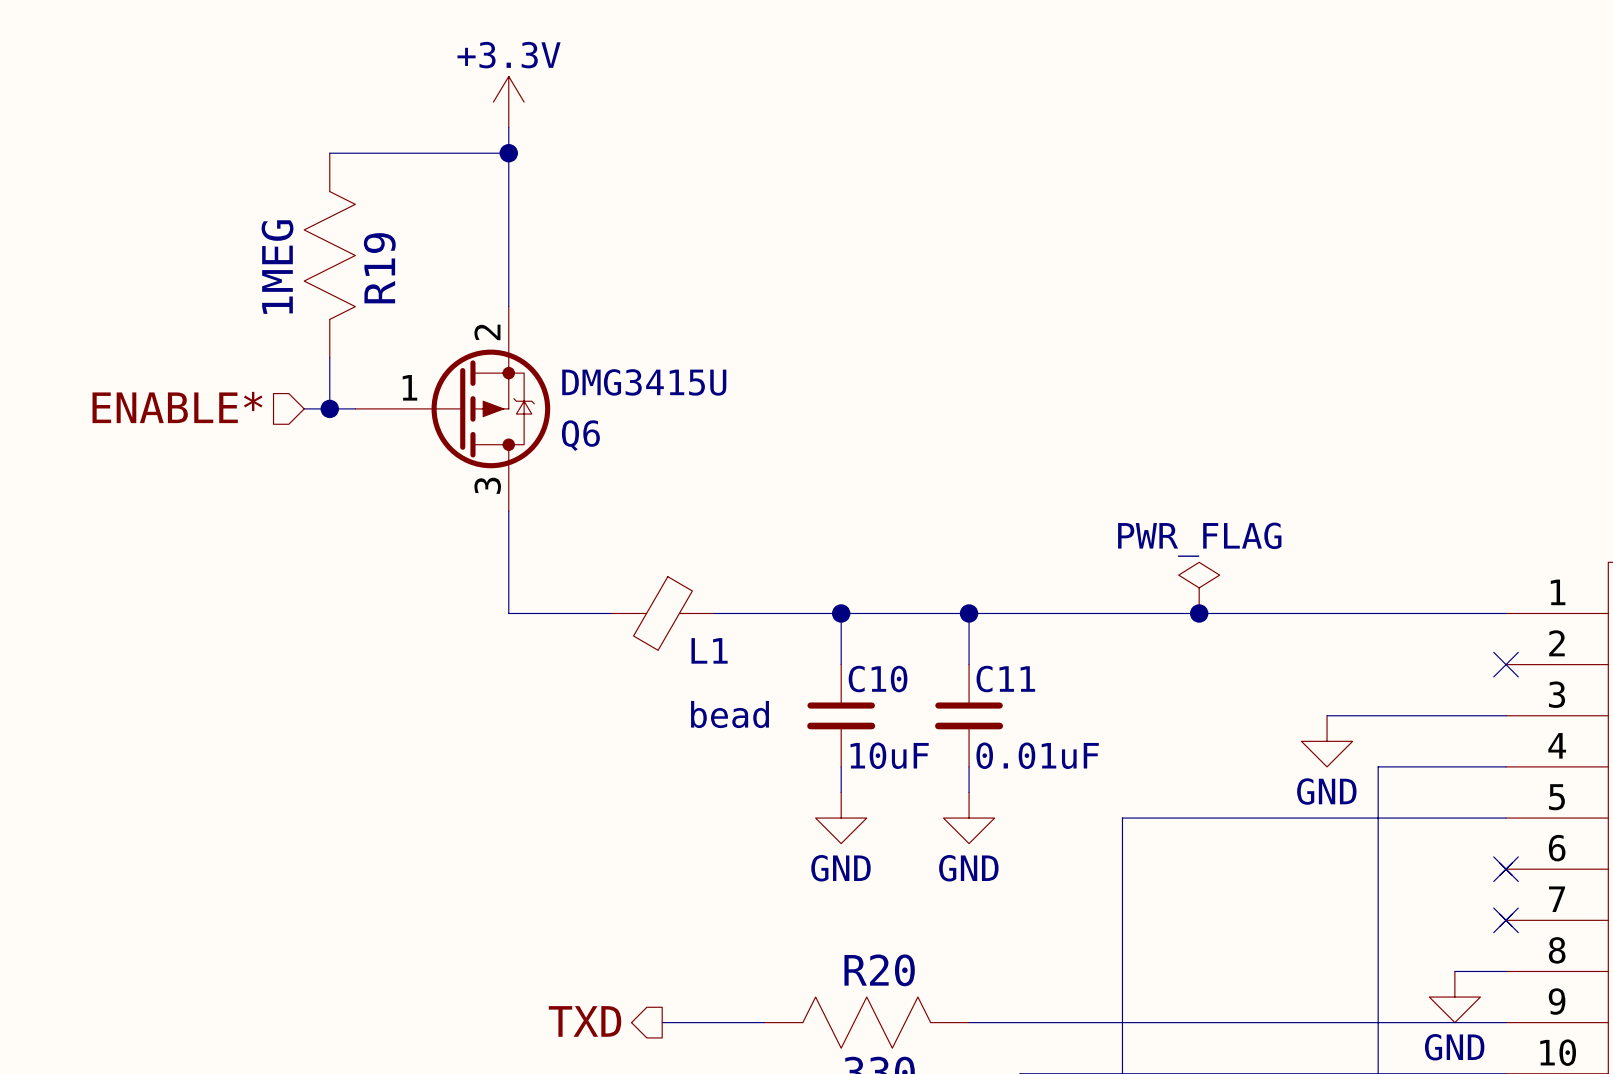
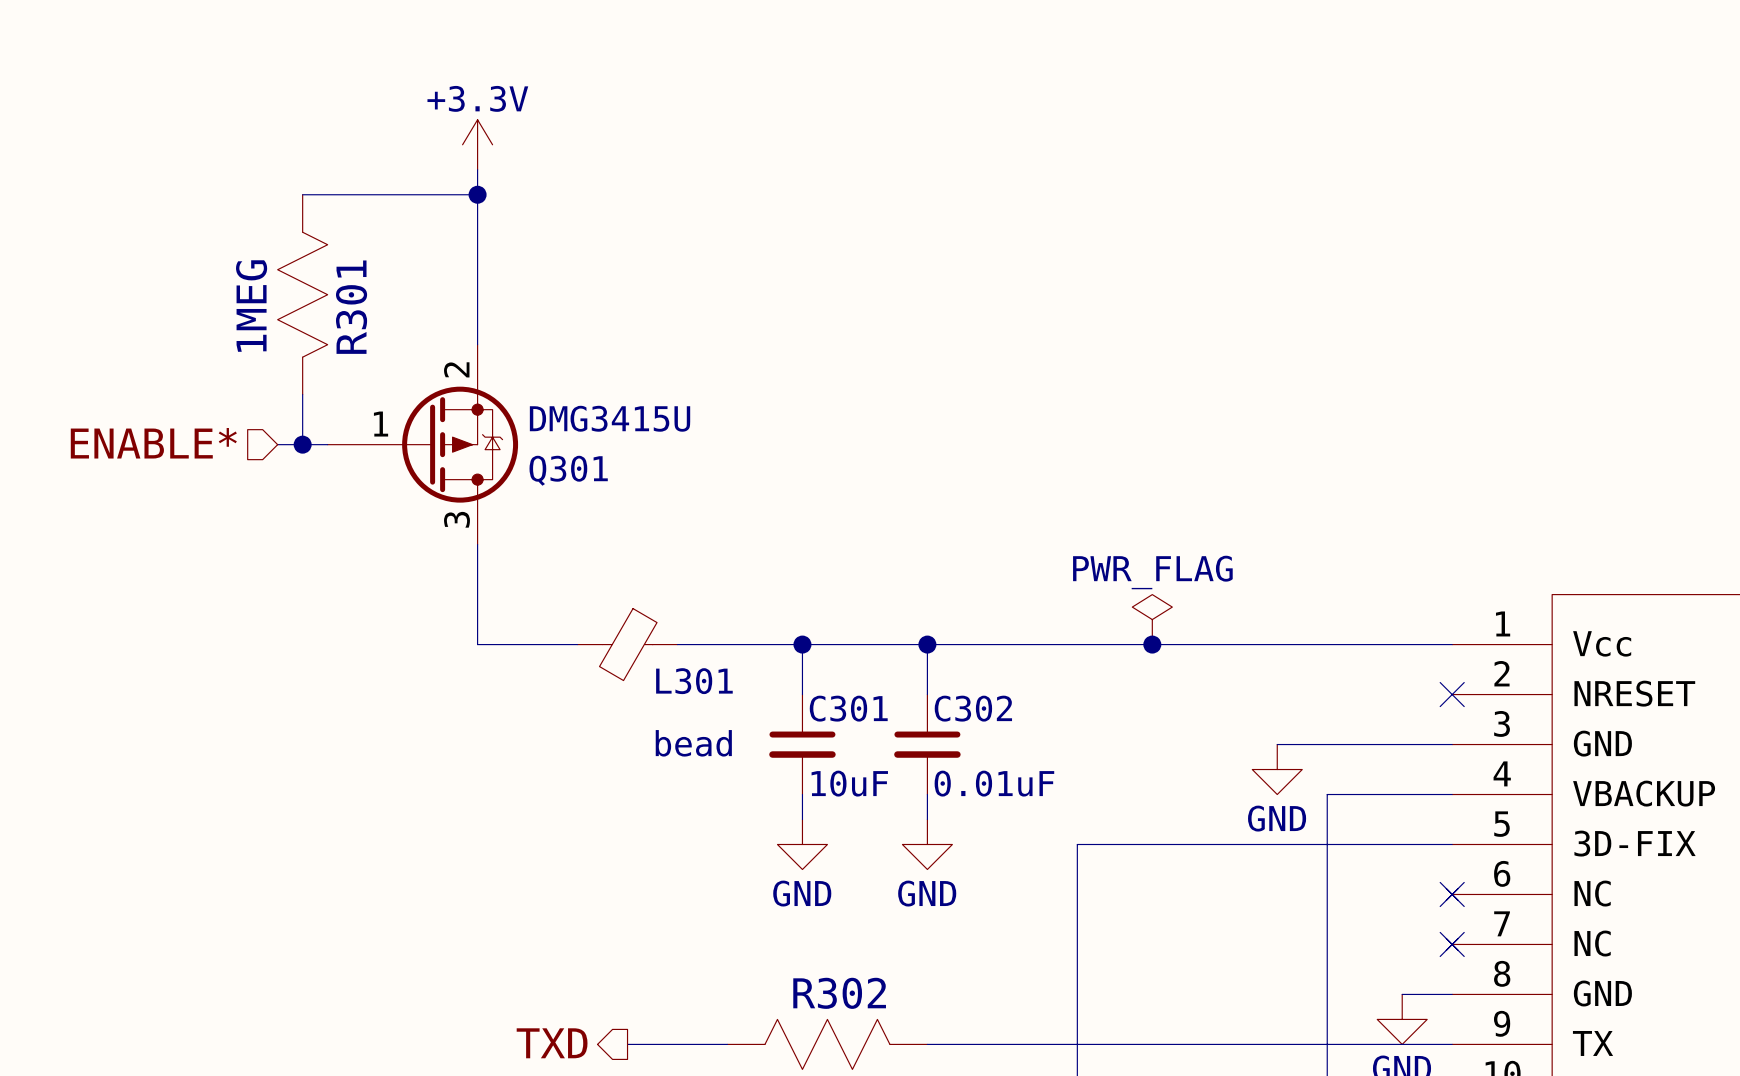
R19 name: R19 (379, 268) -> R301 (351, 307)
Q6 name: Q6 (580, 435) -> Q301 (568, 470)
L1 name: L1 (709, 650) -> L301 (694, 681)
C10 name: C10 (878, 679) -> C301 (848, 708)
C11 name: C11 (1005, 679) -> C302 (973, 708)
R20 name: R20 (879, 970) -> R302 (839, 993)

